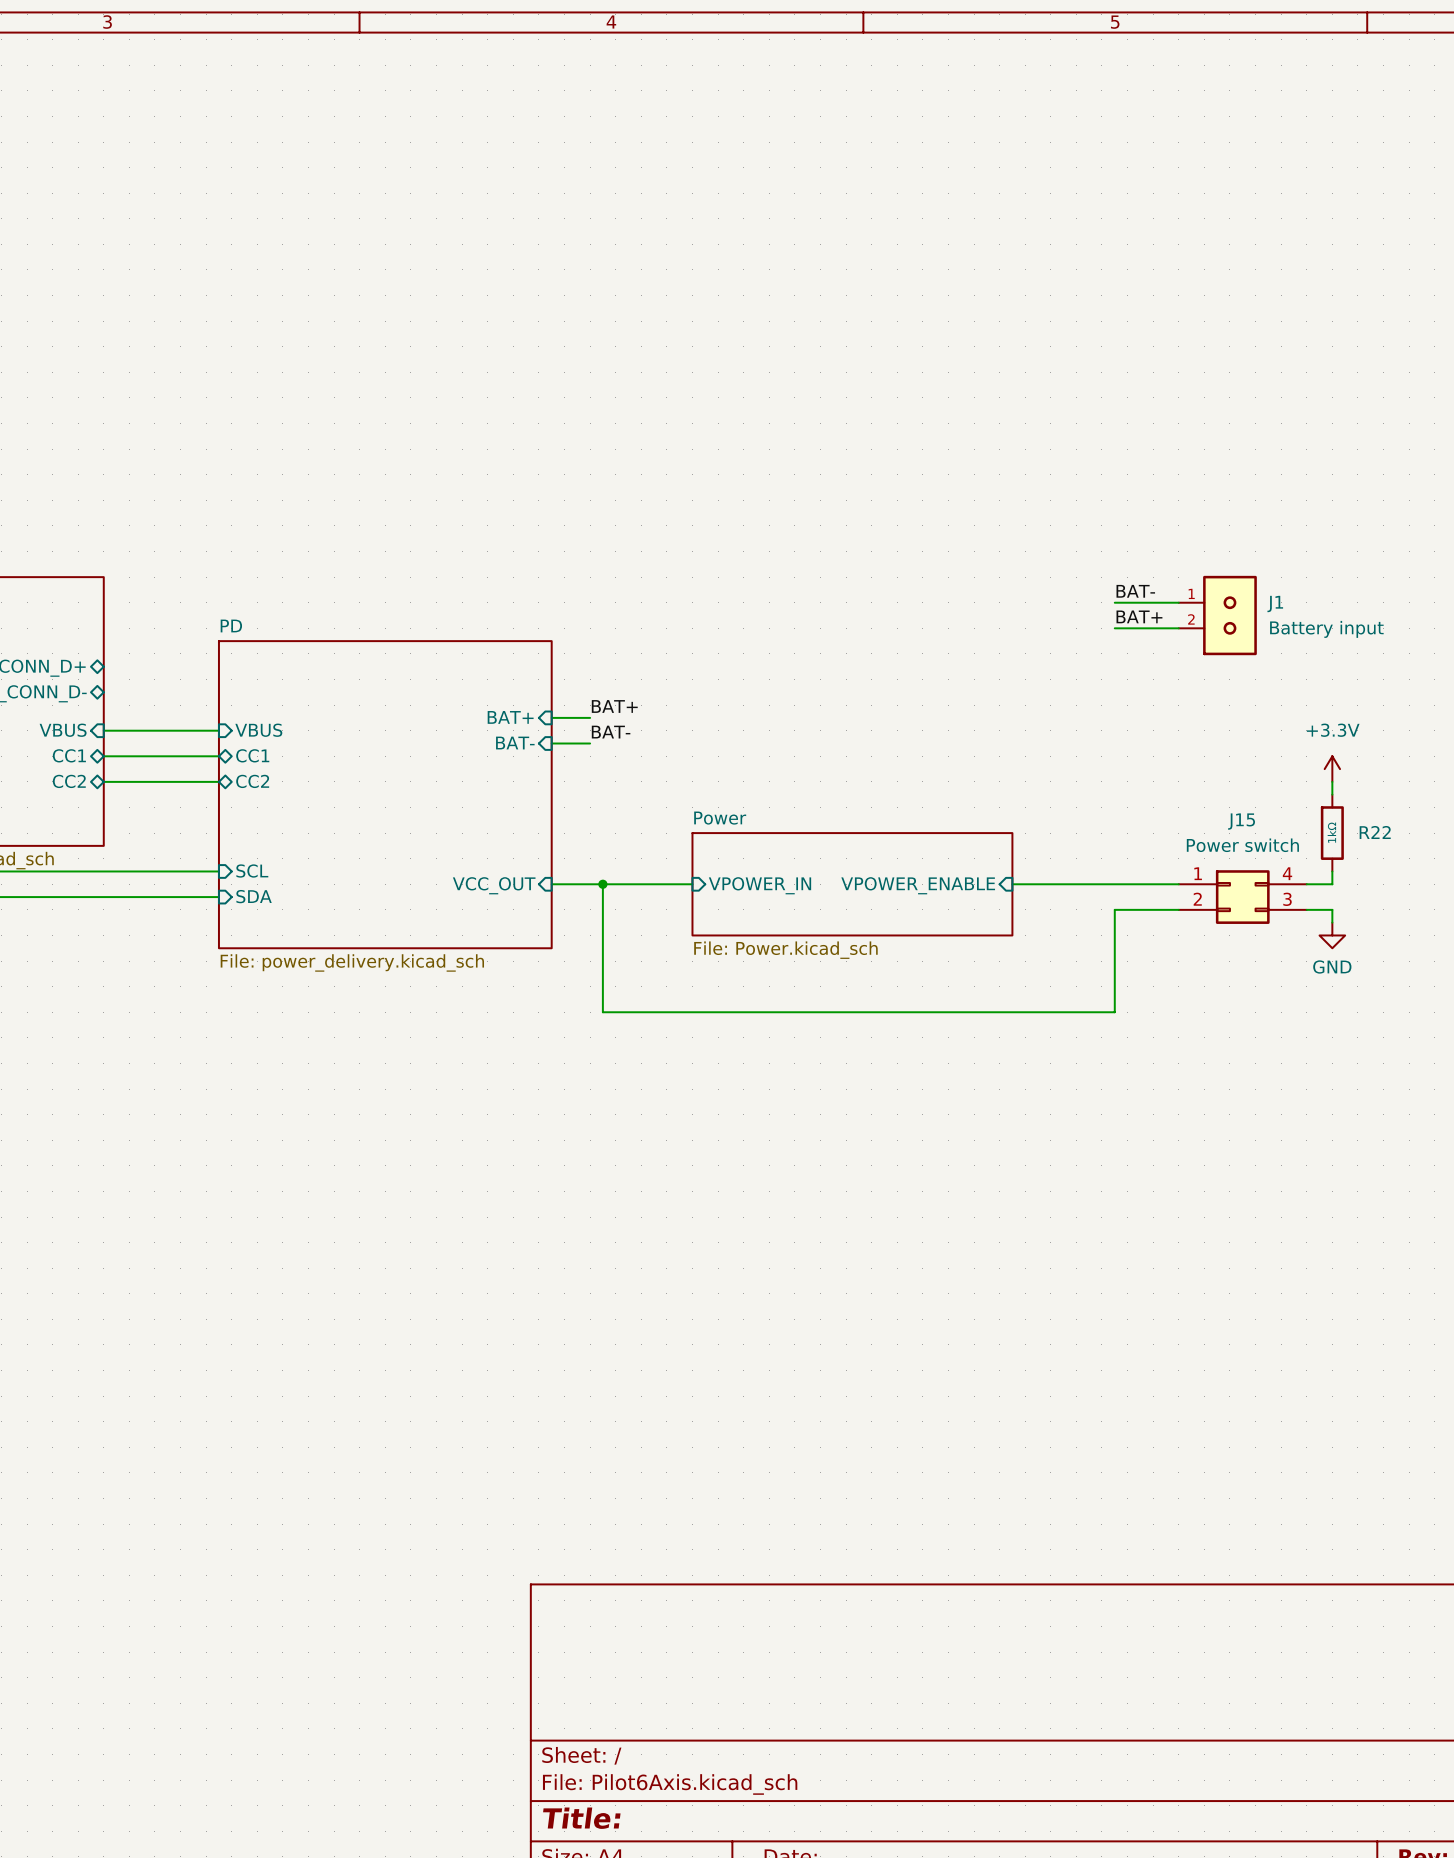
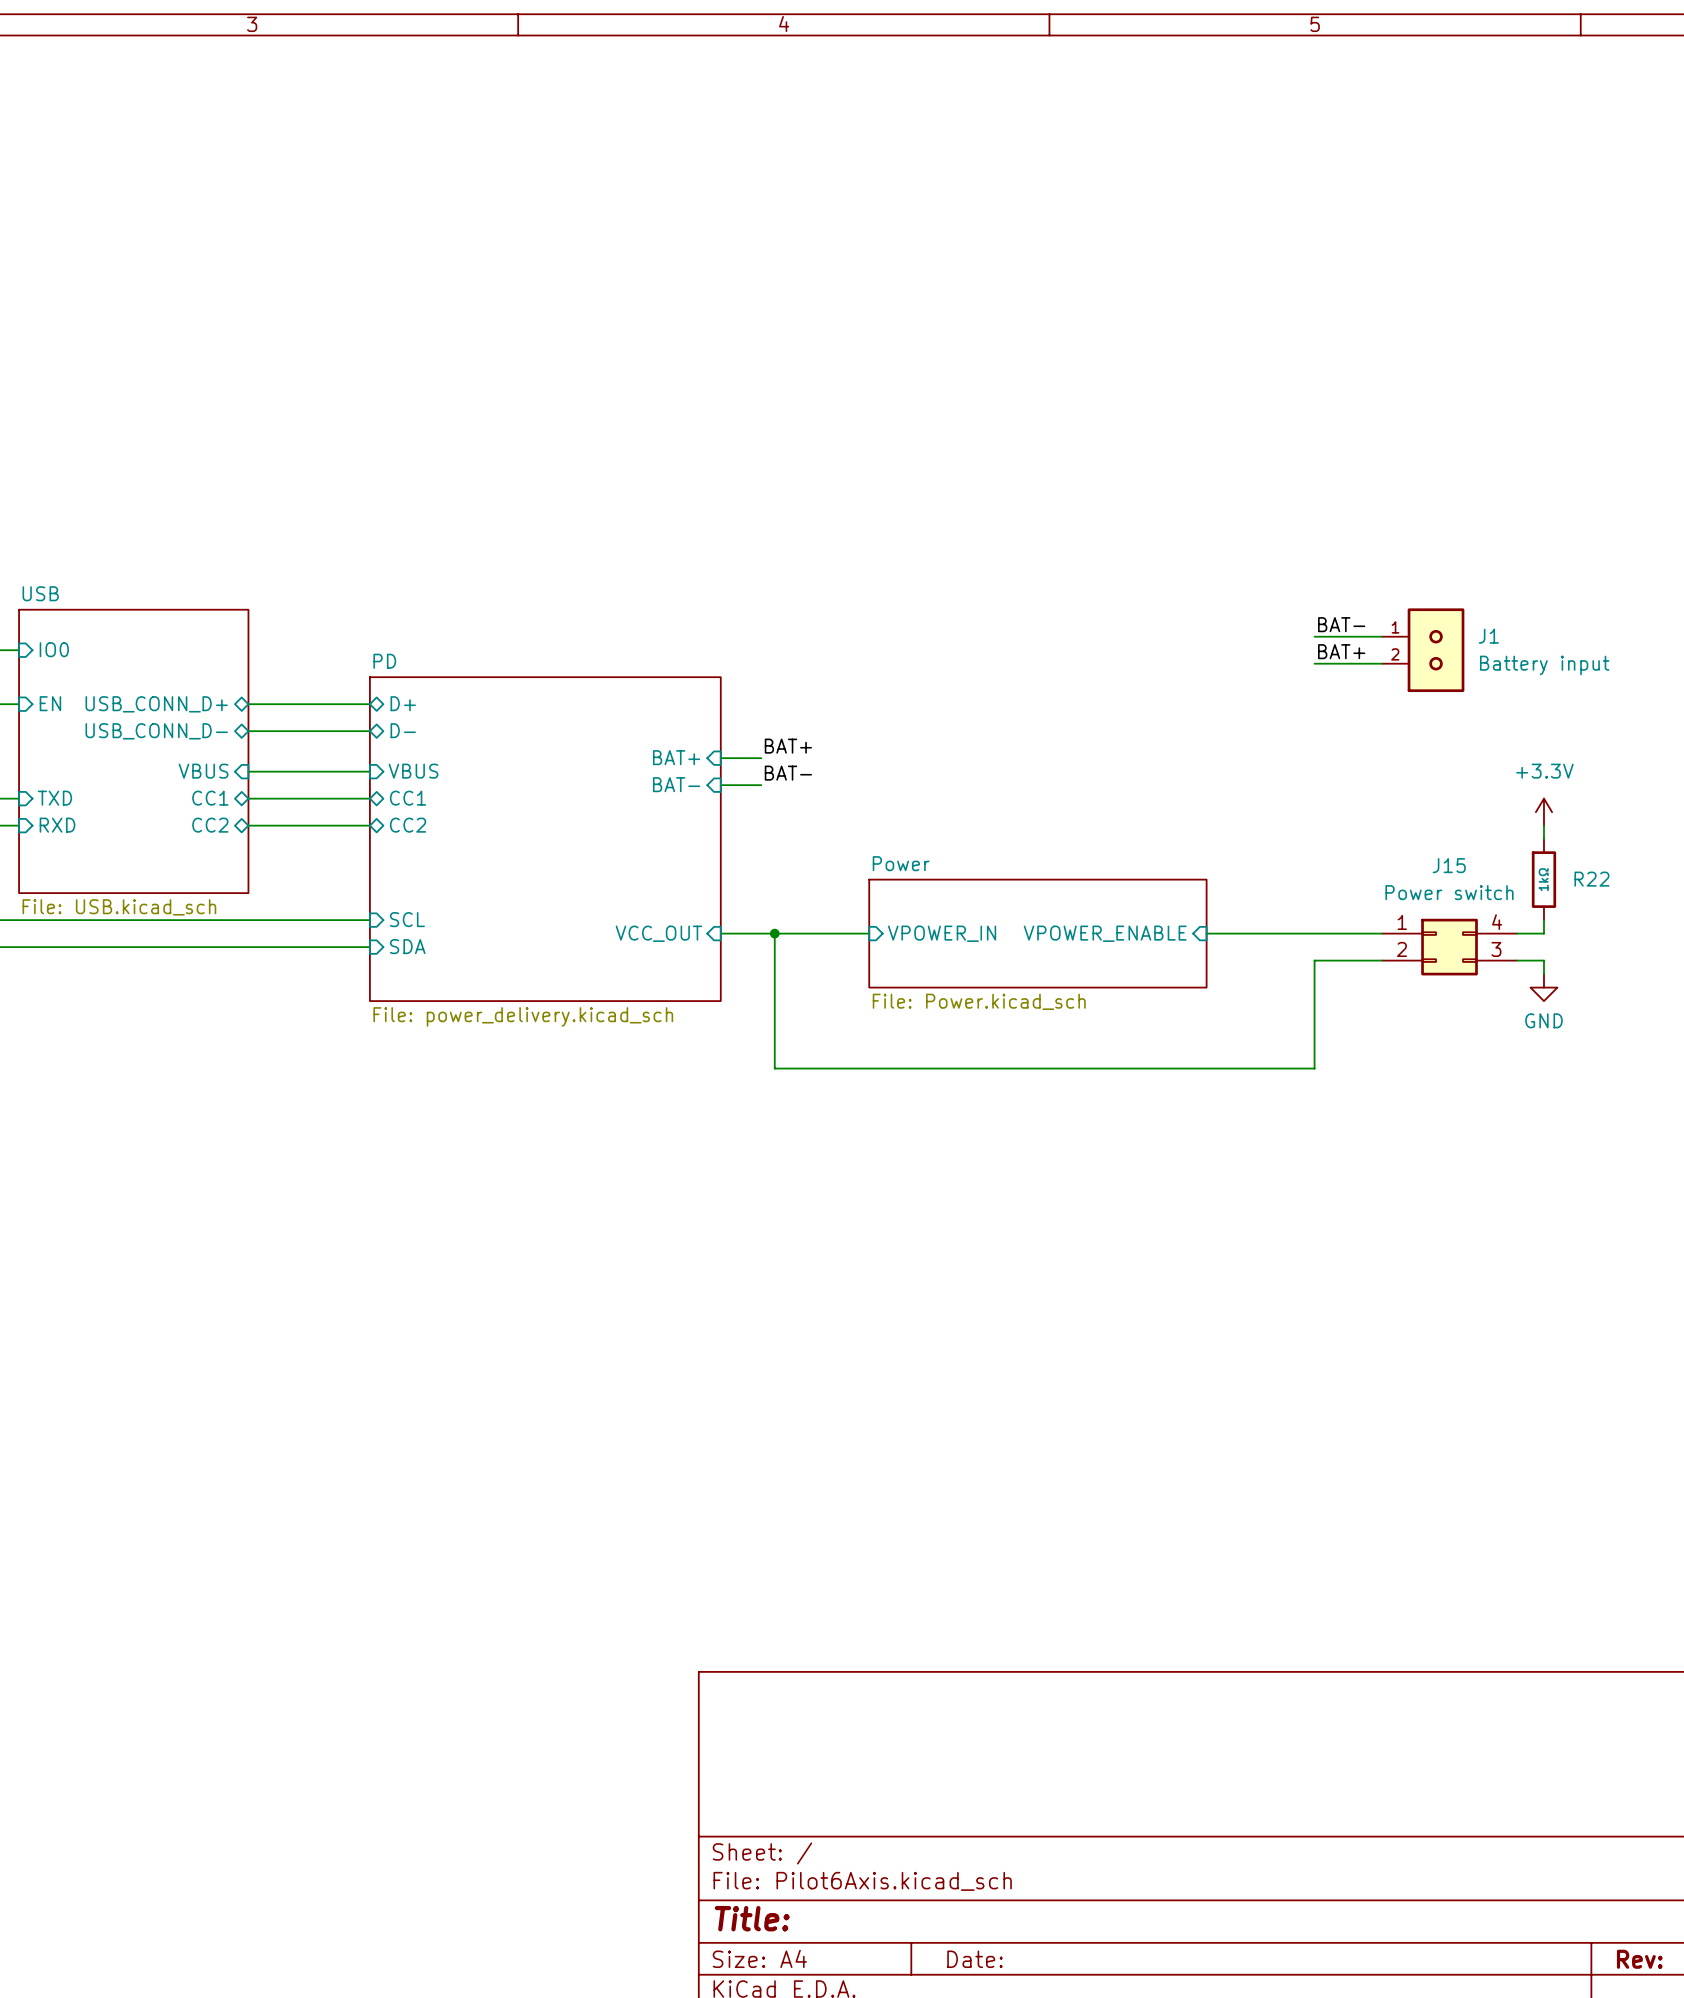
wire: none -> (248, 704) (369, 704)
sheet pin: none -> D+ (403, 703)
sheet pin: none -> D- (403, 730)
wire: none -> (248, 731) (369, 731)

